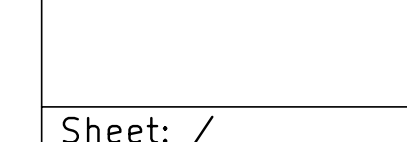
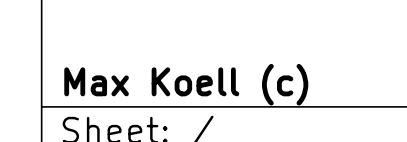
title block: none -> Max Koell (c) (186, 84)

